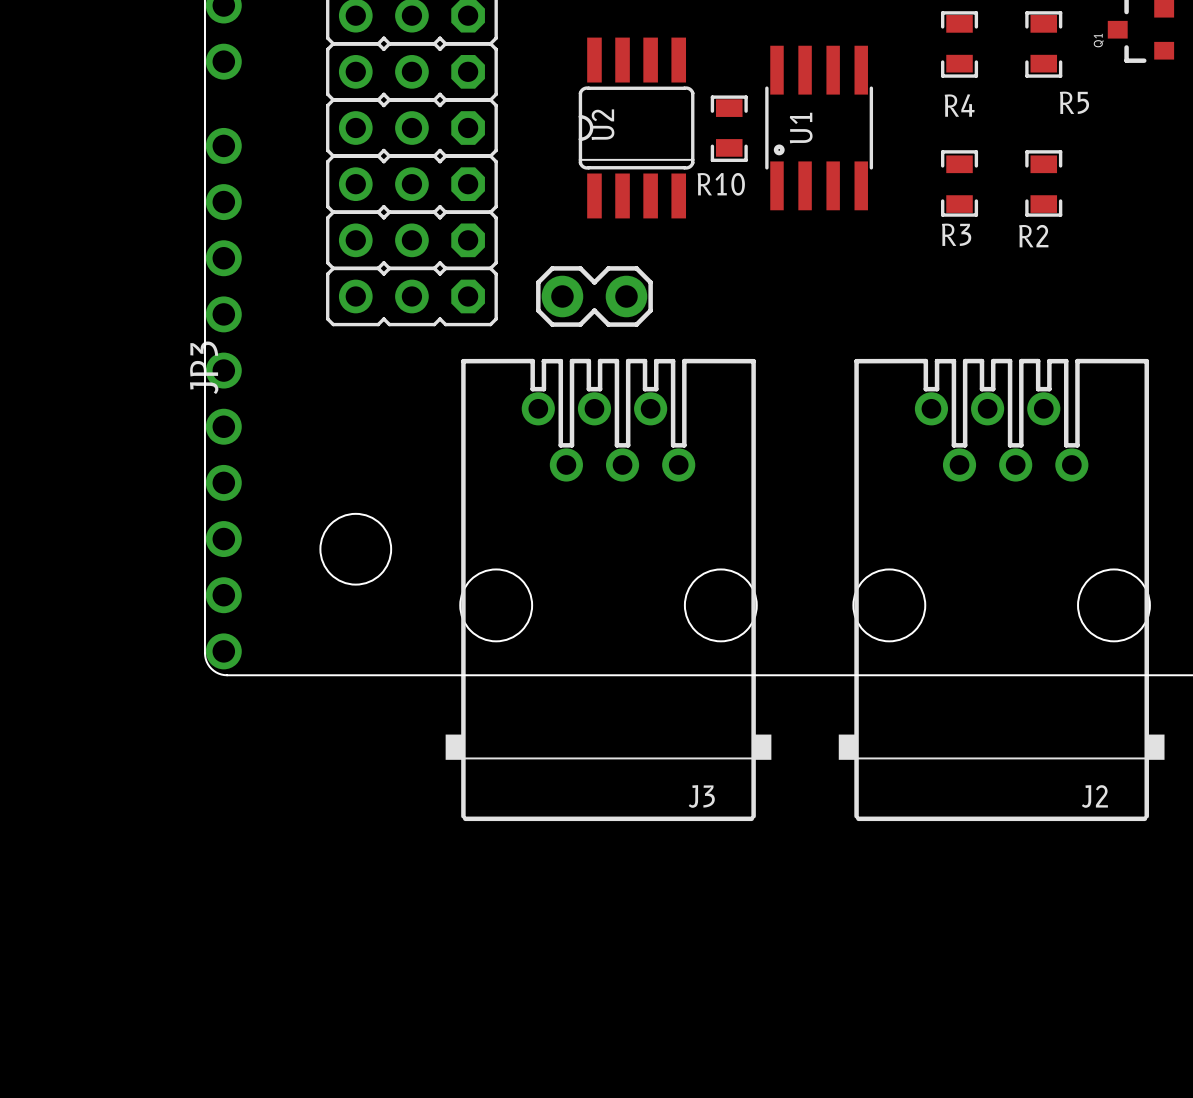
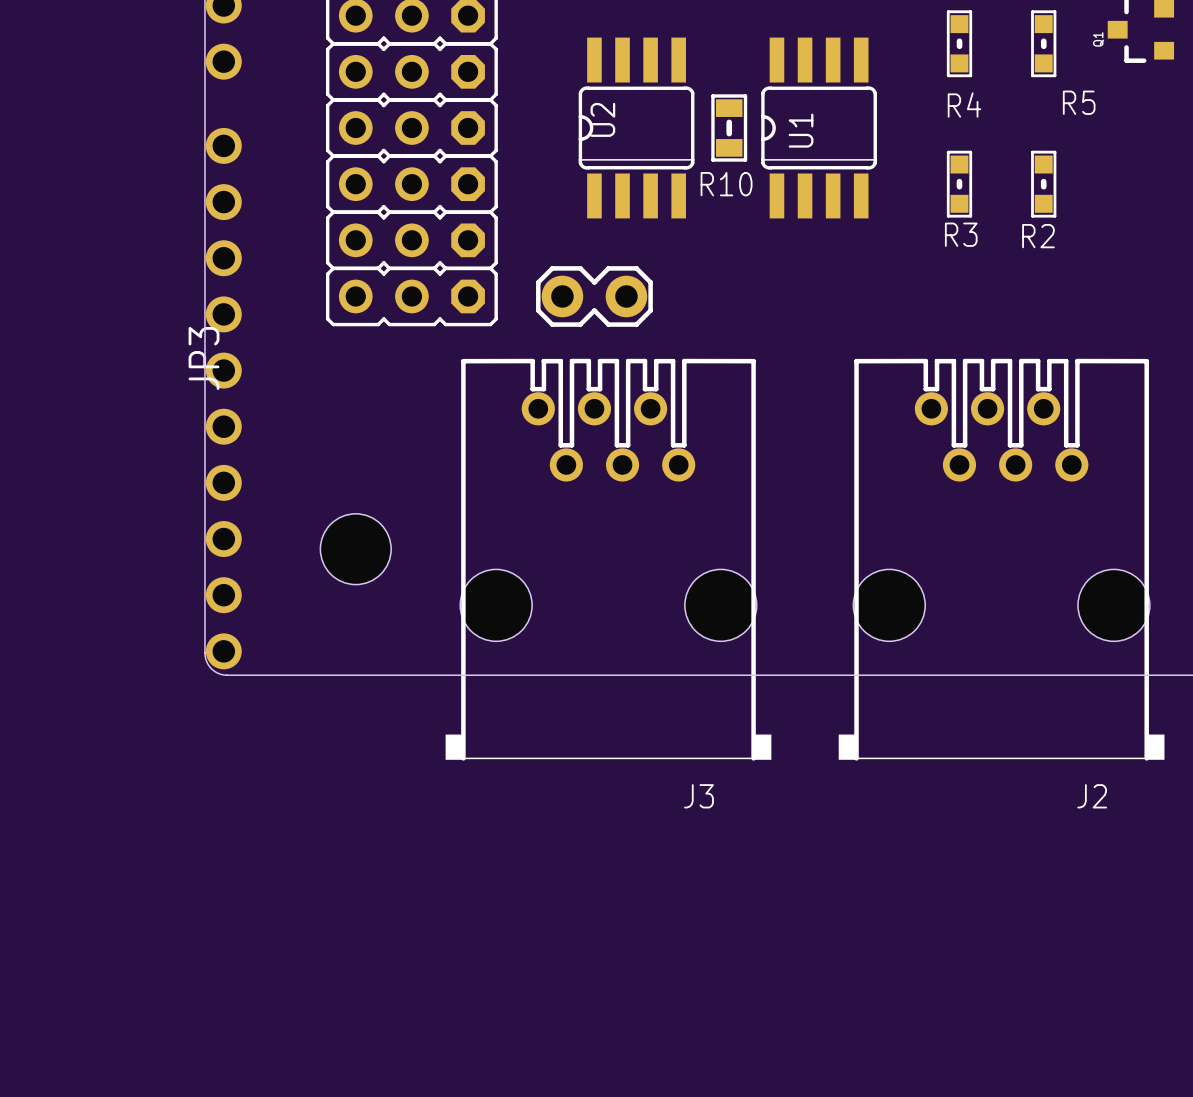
R4 footprint: [940, 11, 979, 78] -> [946, 10, 973, 78]
R5 footprint: [1025, 11, 1063, 78] -> [1031, 10, 1057, 78]
U1 footprint: [765, 45, 874, 211] -> [761, 37, 877, 219]
R10 footprint: [710, 95, 748, 162] -> [711, 94, 748, 162]
R3 footprint: [940, 150, 979, 217] -> [946, 150, 973, 218]
R2 footprint: [1025, 150, 1063, 217] -> [1031, 150, 1057, 218]
J3 footprint: [445, 358, 772, 822] -> [445, 358, 772, 761]
J2 footprint: [838, 358, 1165, 822] -> [838, 358, 1165, 761]

